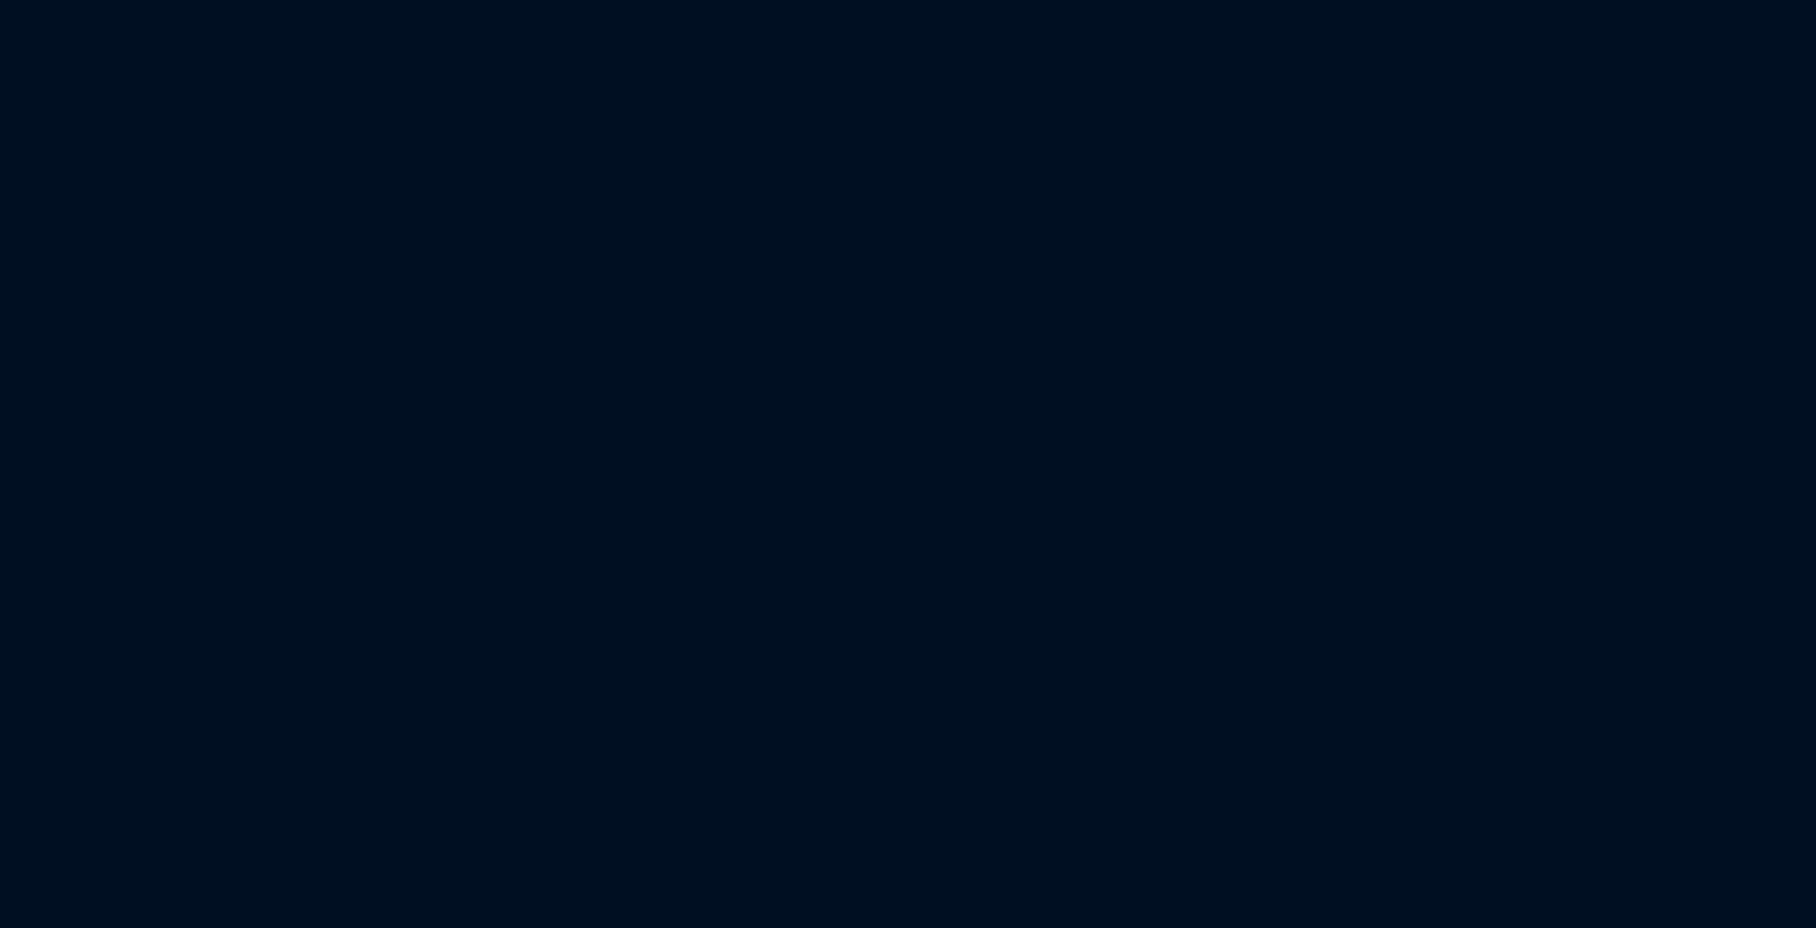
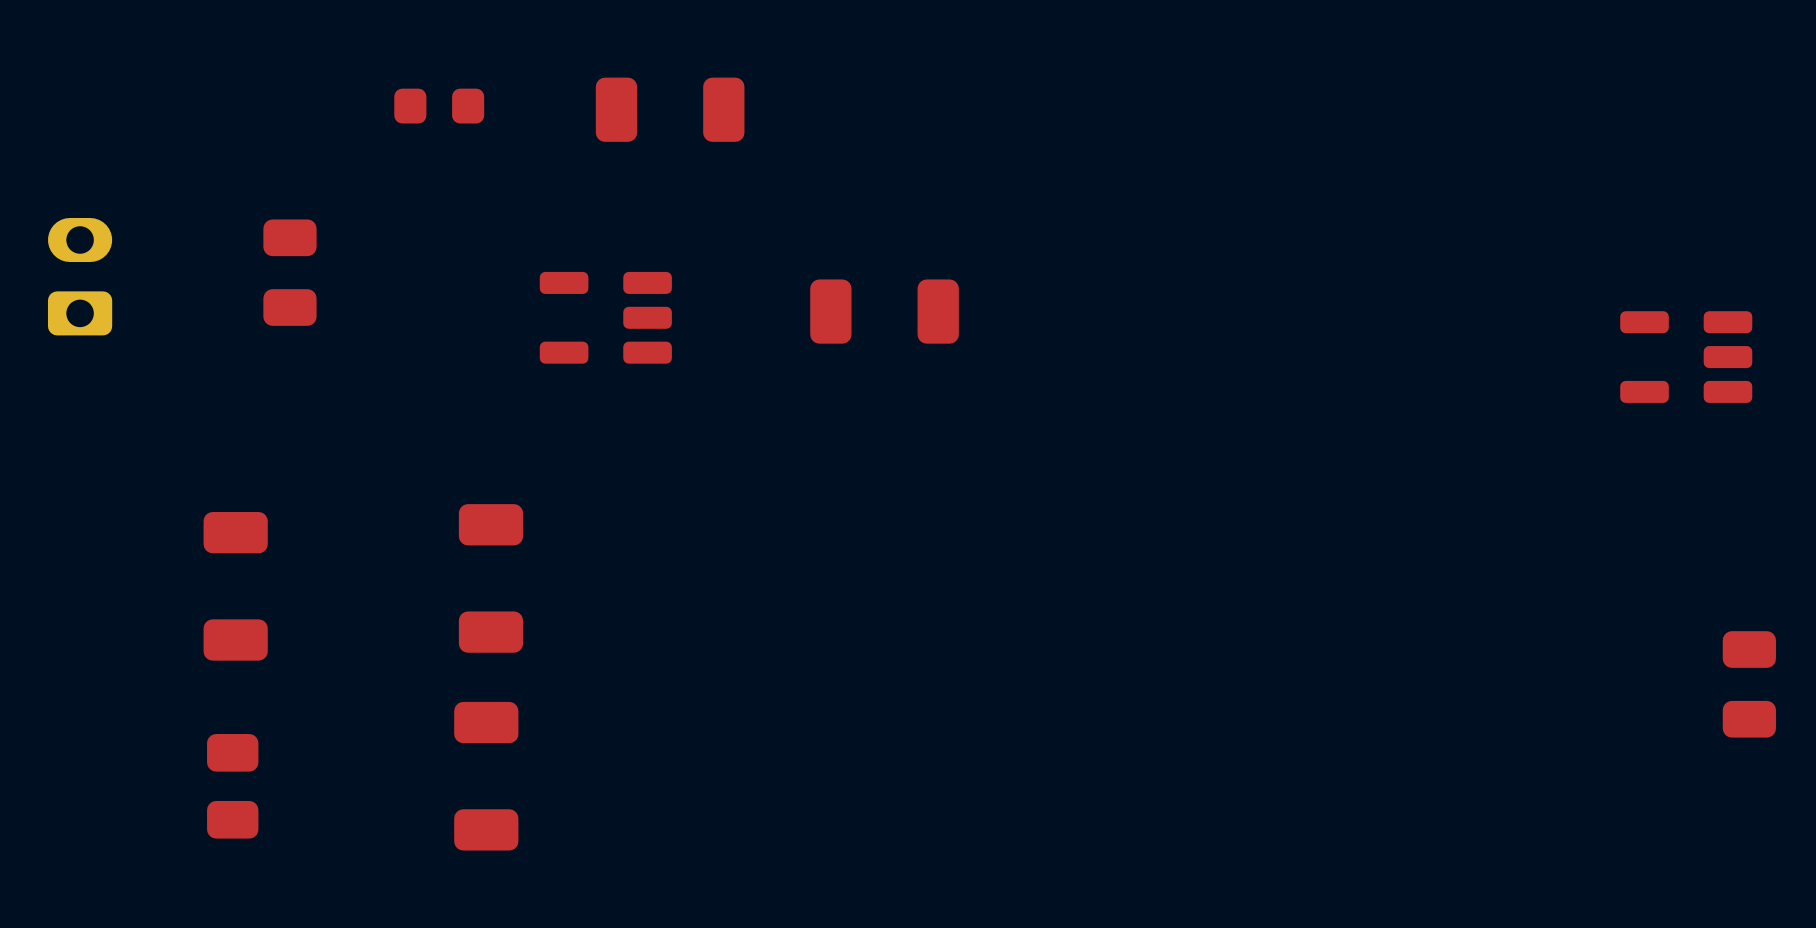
part: none -> (439, 106)
part: none -> (670, 109)
part: none -> (289, 272)
part: none -> (80, 276)
part: none -> (884, 311)
part: none -> (605, 317)
part: none -> (1686, 357)
part: none -> (490, 578)
part: none -> (235, 586)
part: none -> (1749, 684)
part: none -> (486, 776)
part: none -> (232, 786)

